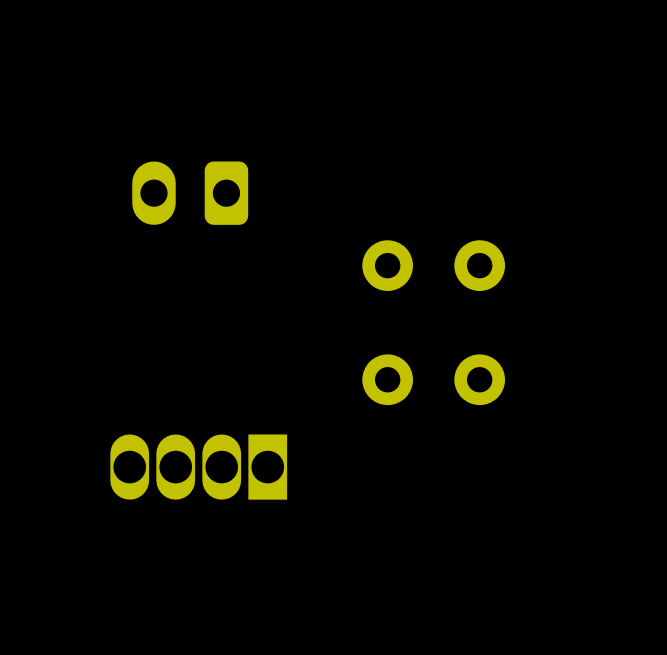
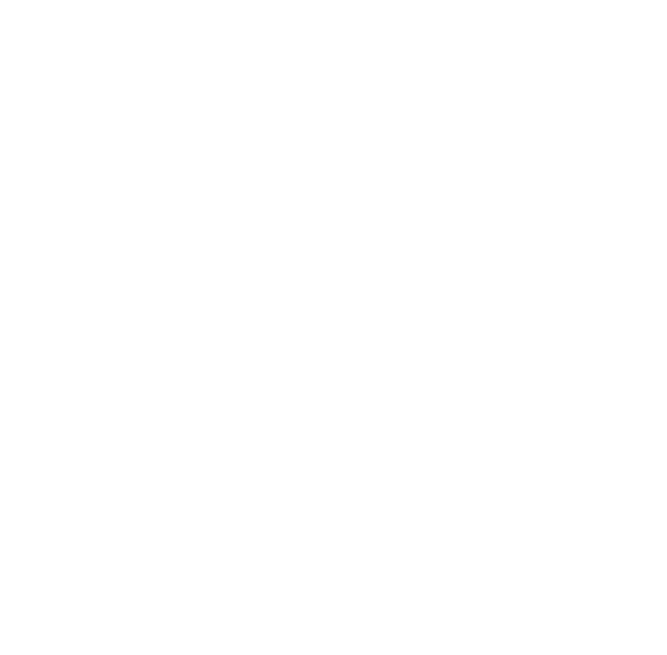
part: (190, 193) -> none
part: (433, 265) -> none
part: (433, 379) -> none
part: (198, 467) -> none

